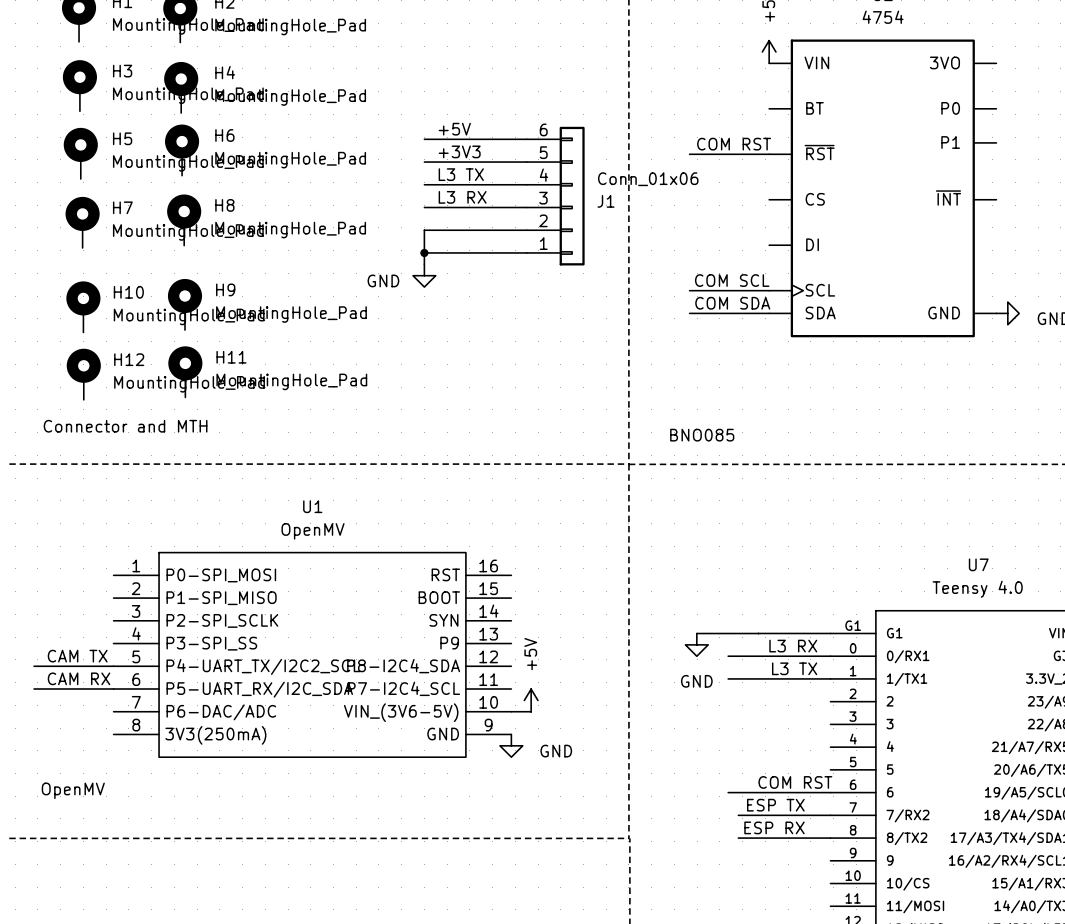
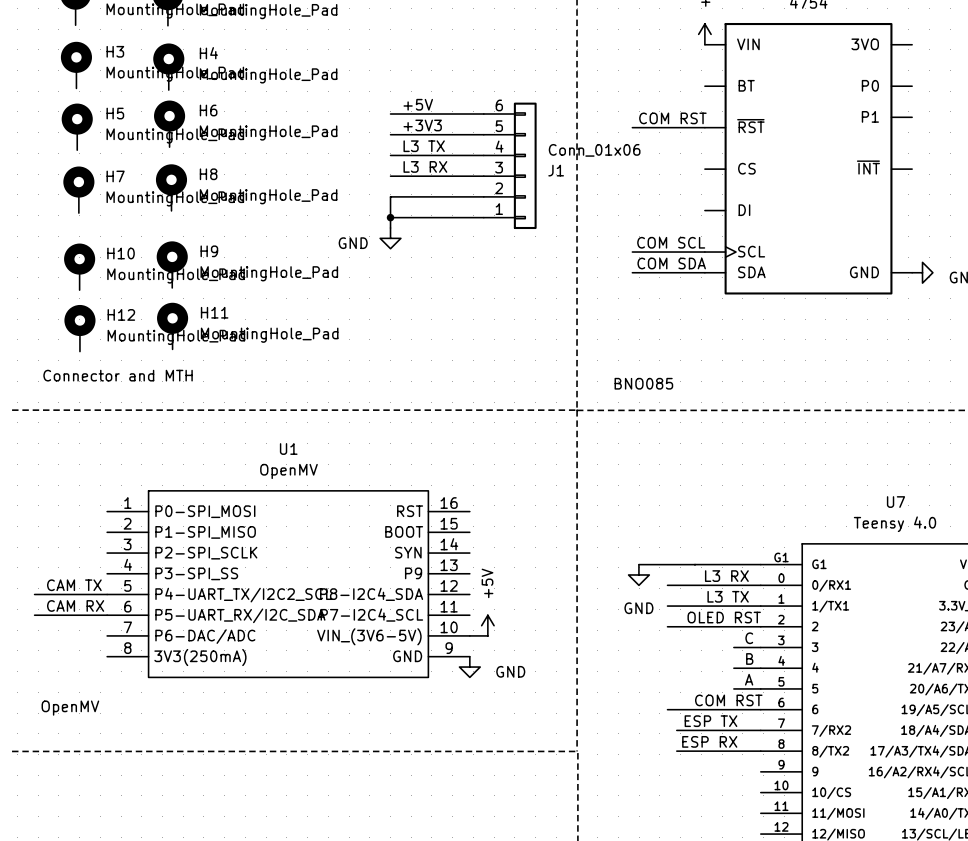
label: none -> OLED RST (724, 617)
wire: none -> (667, 626) (760, 626)
label: none -> C (749, 638)
wire: none -> (733, 647) (760, 647)
label: none -> B (749, 658)
wire: none -> (733, 668) (760, 668)
label: none -> A (749, 679)
wire: none -> (733, 688) (760, 688)

